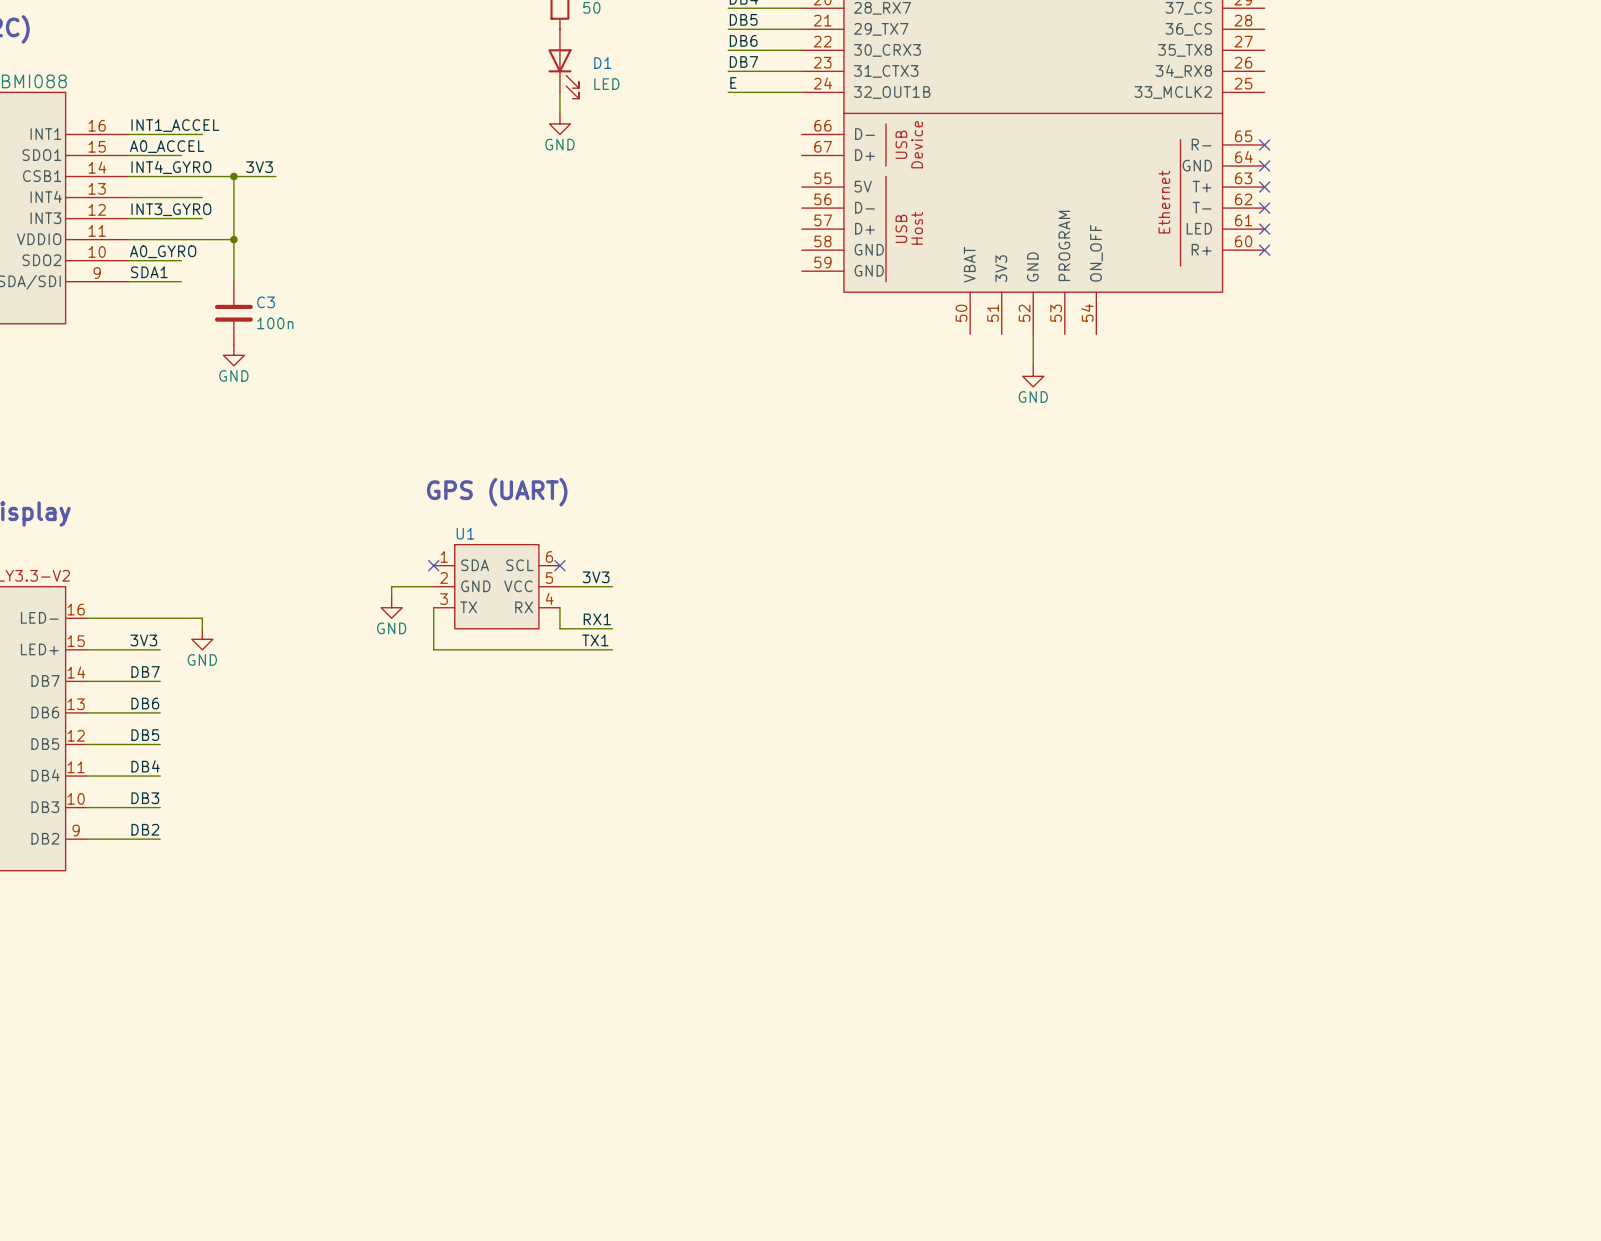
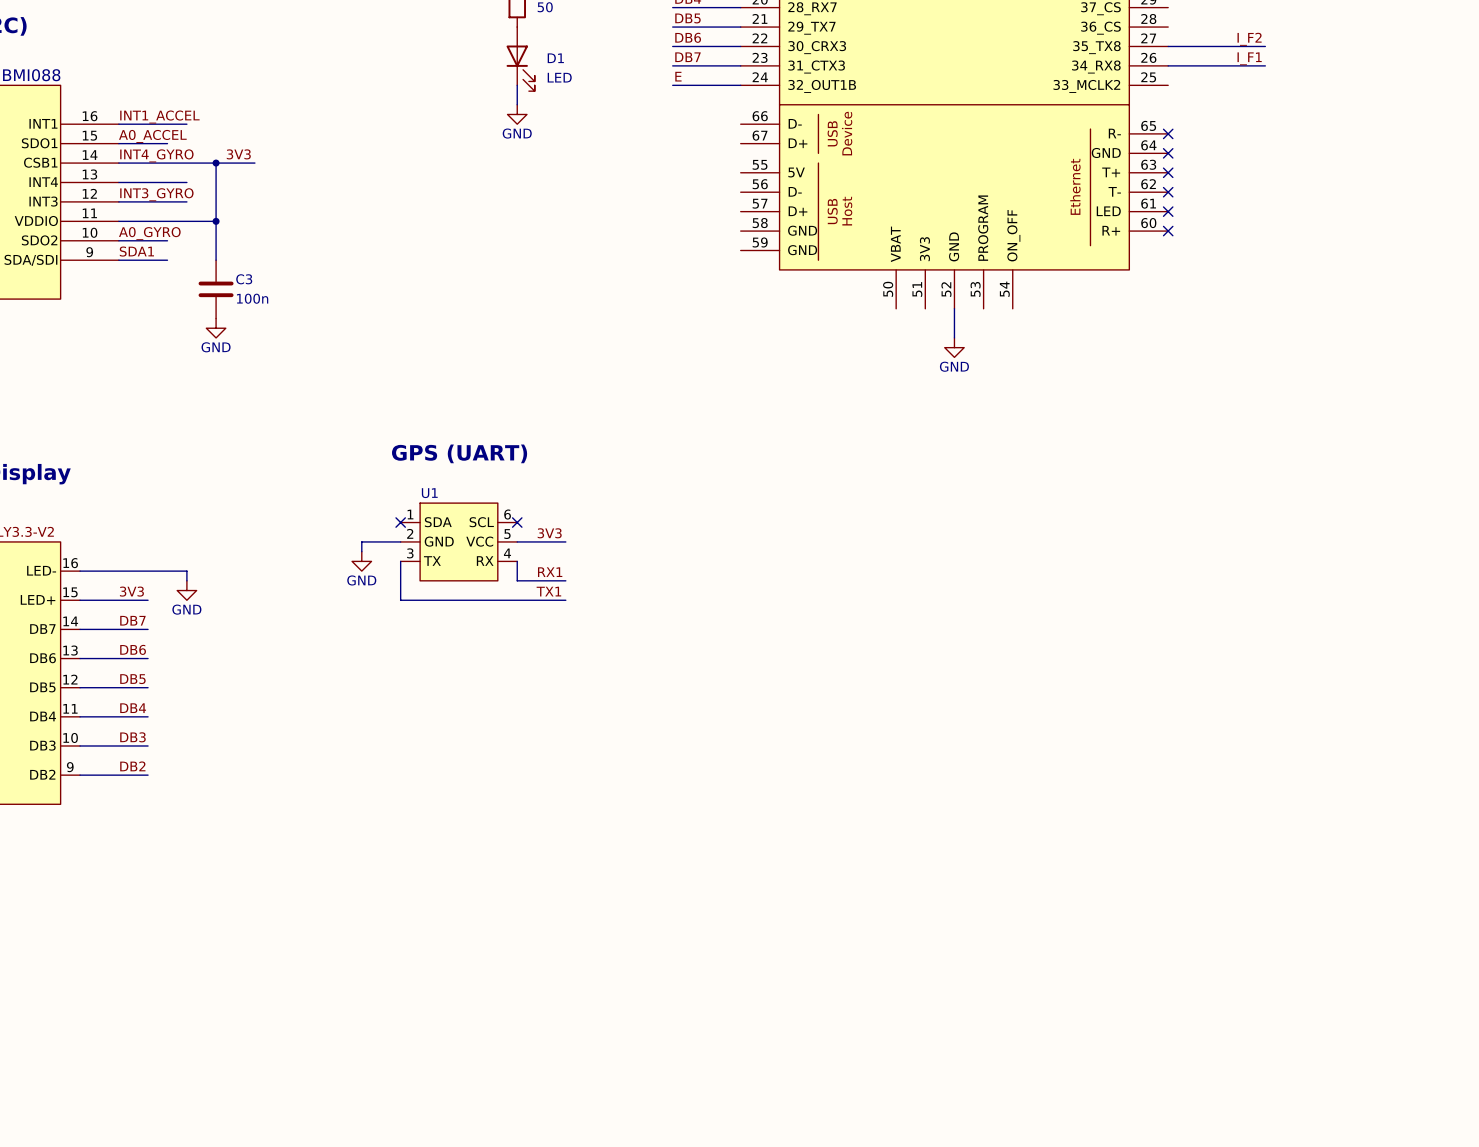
label: none -> I_F2 (1249, 39)
wire: none -> (1168, 46) (1265, 46)
label: none -> I_F1 (1249, 58)
wire: none -> (1168, 65) (1265, 65)

